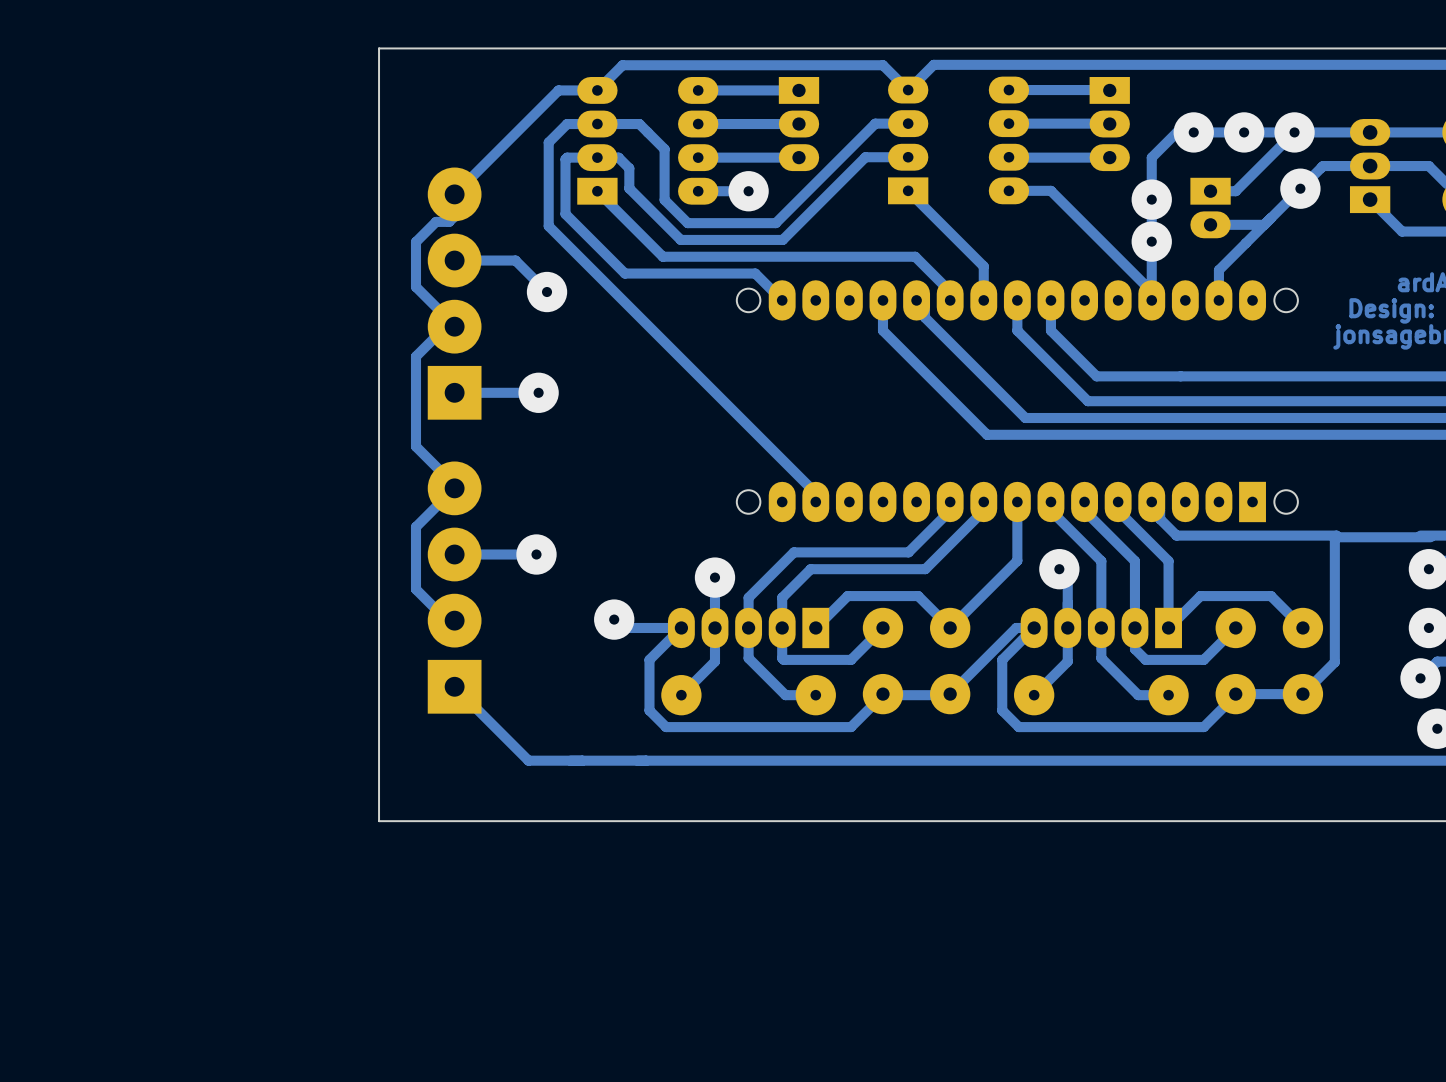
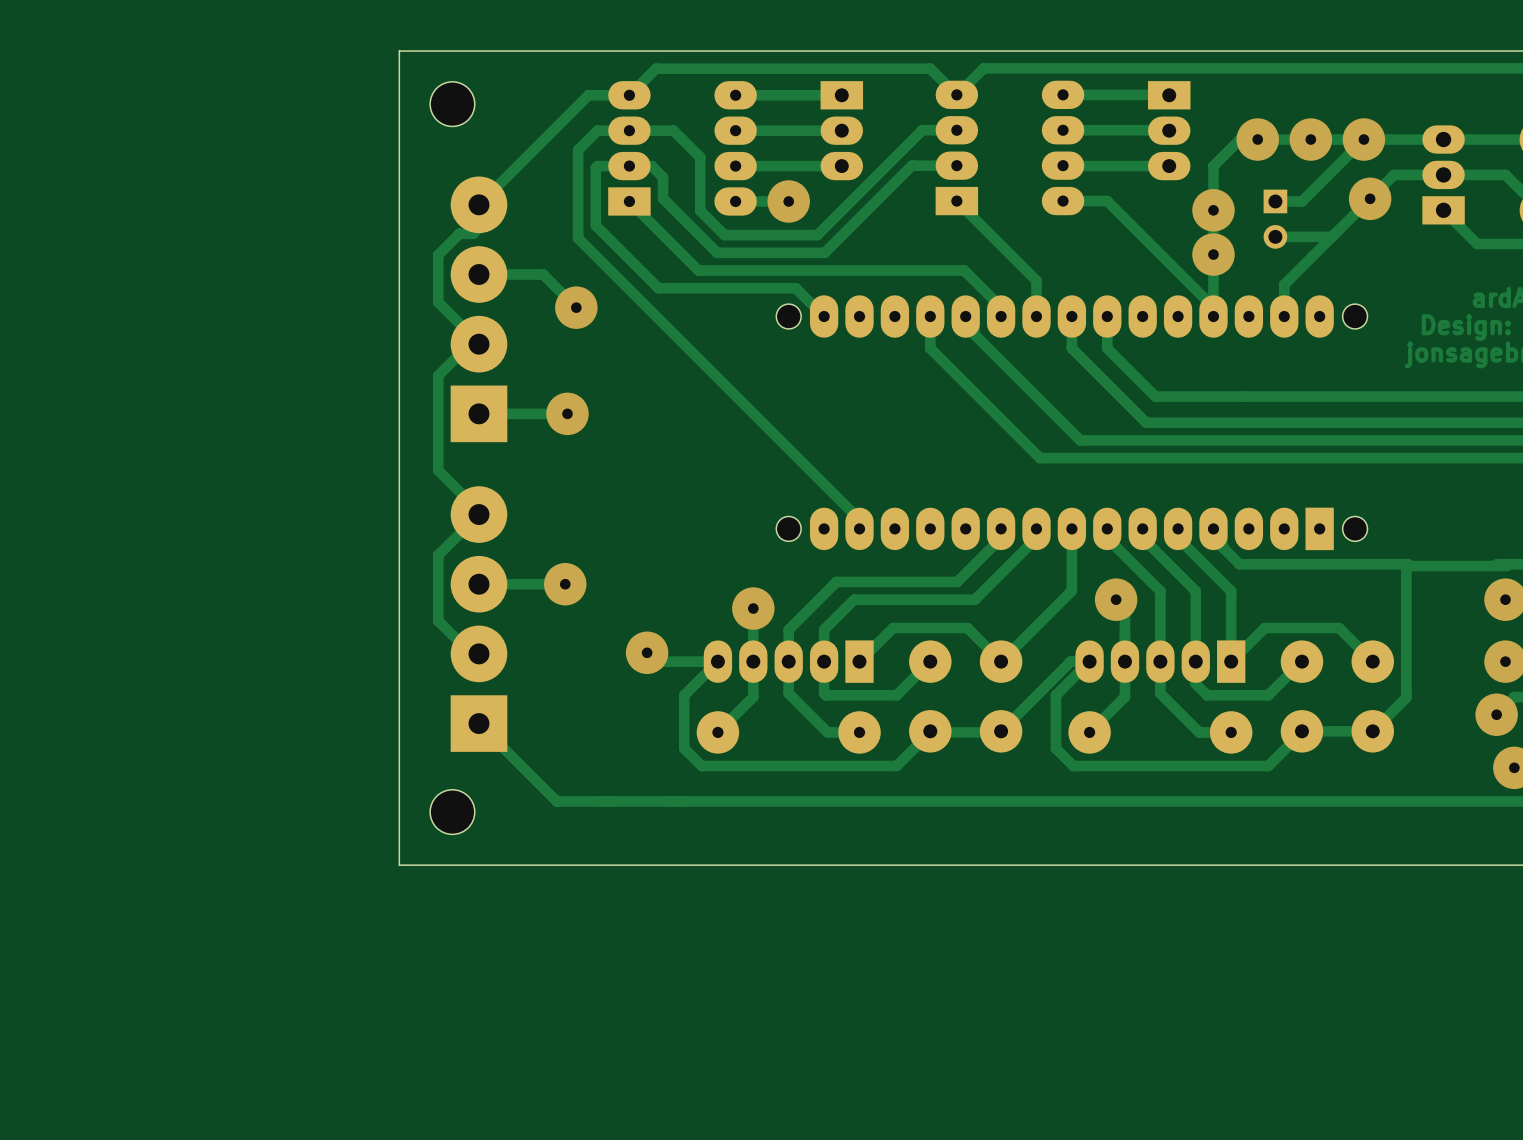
part: none -> (452, 104)
part footprint: [1190, 177, 1231, 239] -> [1263, 189, 1288, 249]
part: none -> (452, 812)

